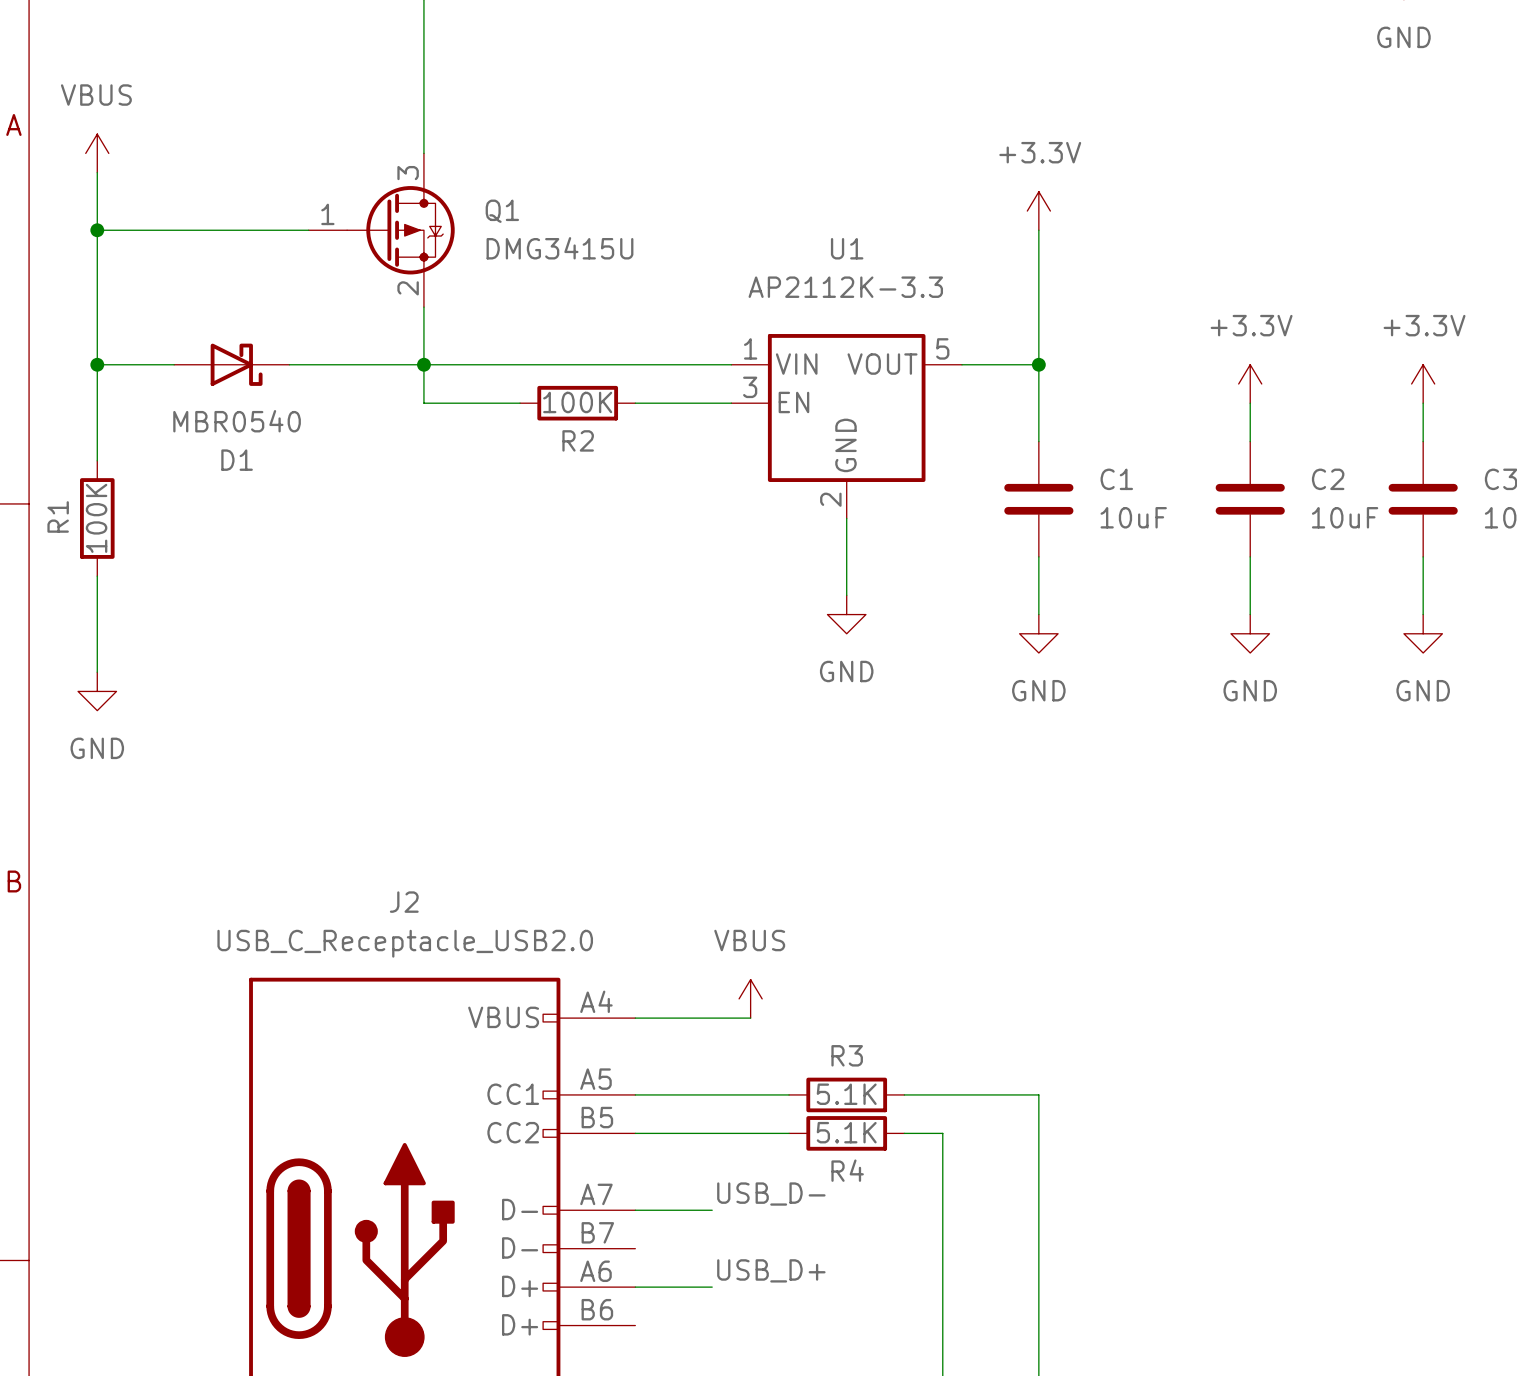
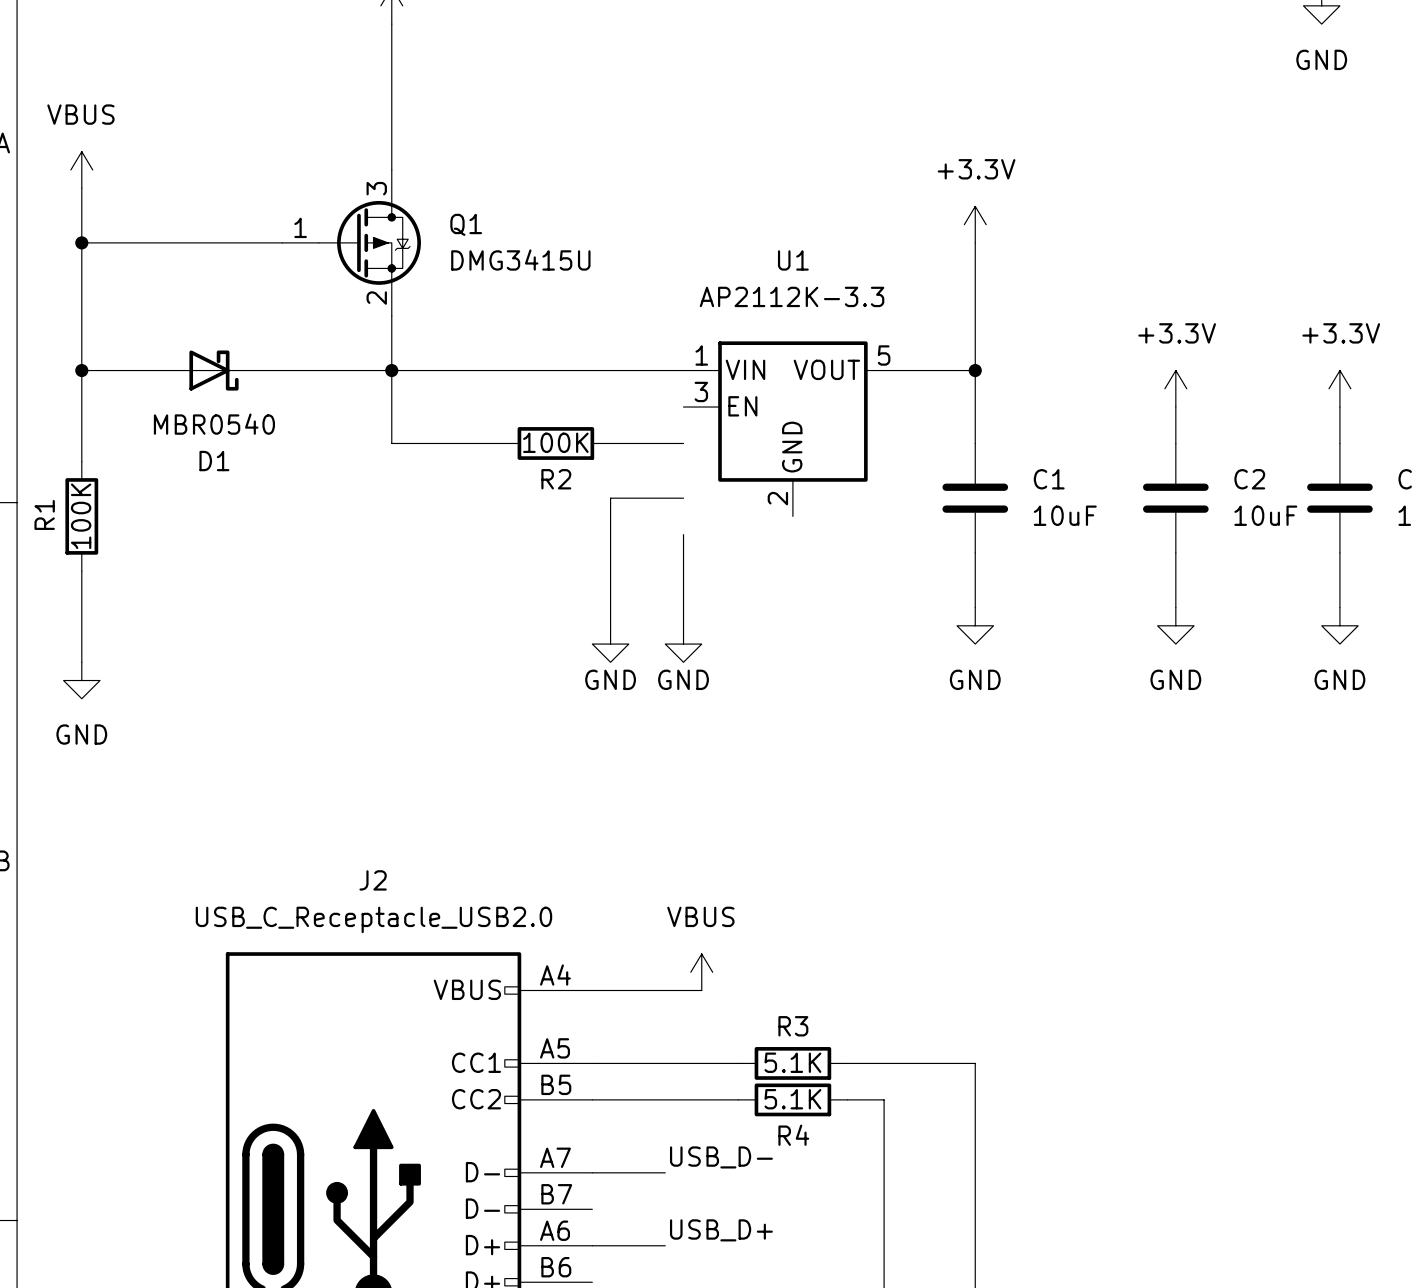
wire: (423, 403) (520, 403) -> (391, 407) (391, 443) (501, 443)
R2 position: (577, 403) -> (555, 443)
wire: (635, 403) (731, 403) -> none
wire: none -> (610, 443) (683, 443)
wire: none -> (683, 498) (610, 498) (610, 625)
wire: (846, 518) (846, 595) -> none
wire: none -> (683, 534) (683, 625)
power symbol: GND (846, 614) -> none
power symbol: none -> GND (610, 644)
power symbol: none -> GND (683, 644)

